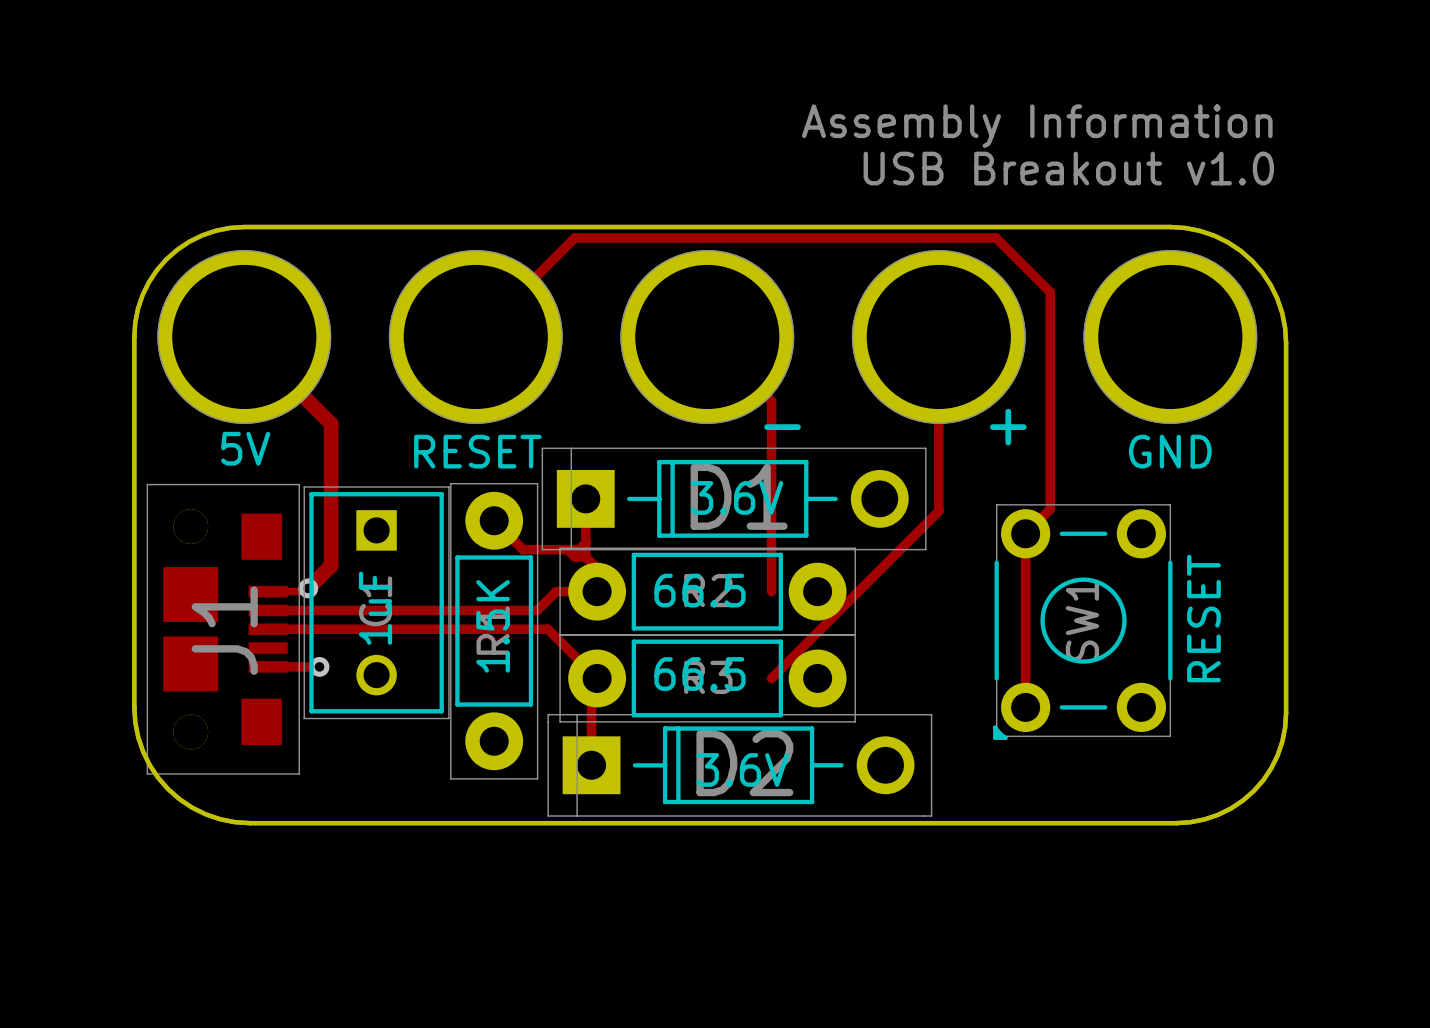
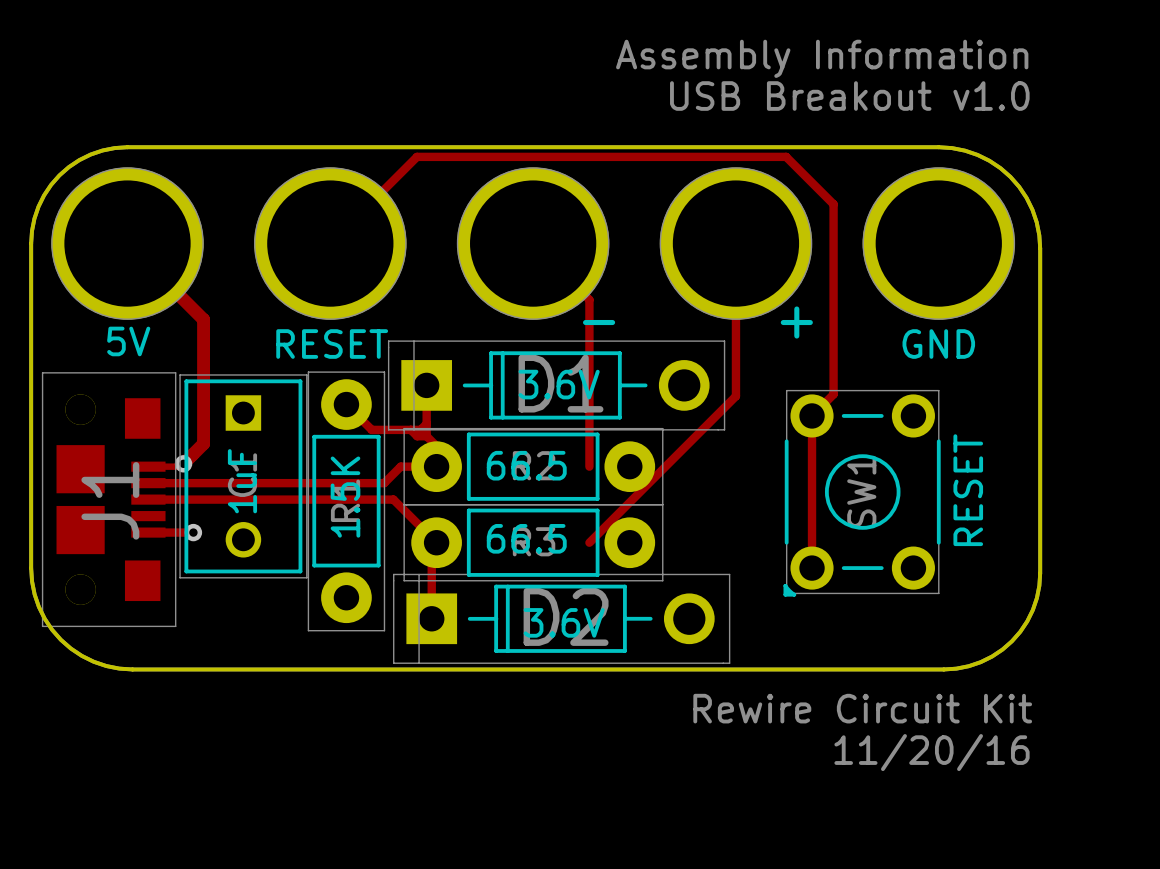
text: none -> Rewire Circuit Kit (862, 708)
text: none -> 11/20/16 (932, 752)

